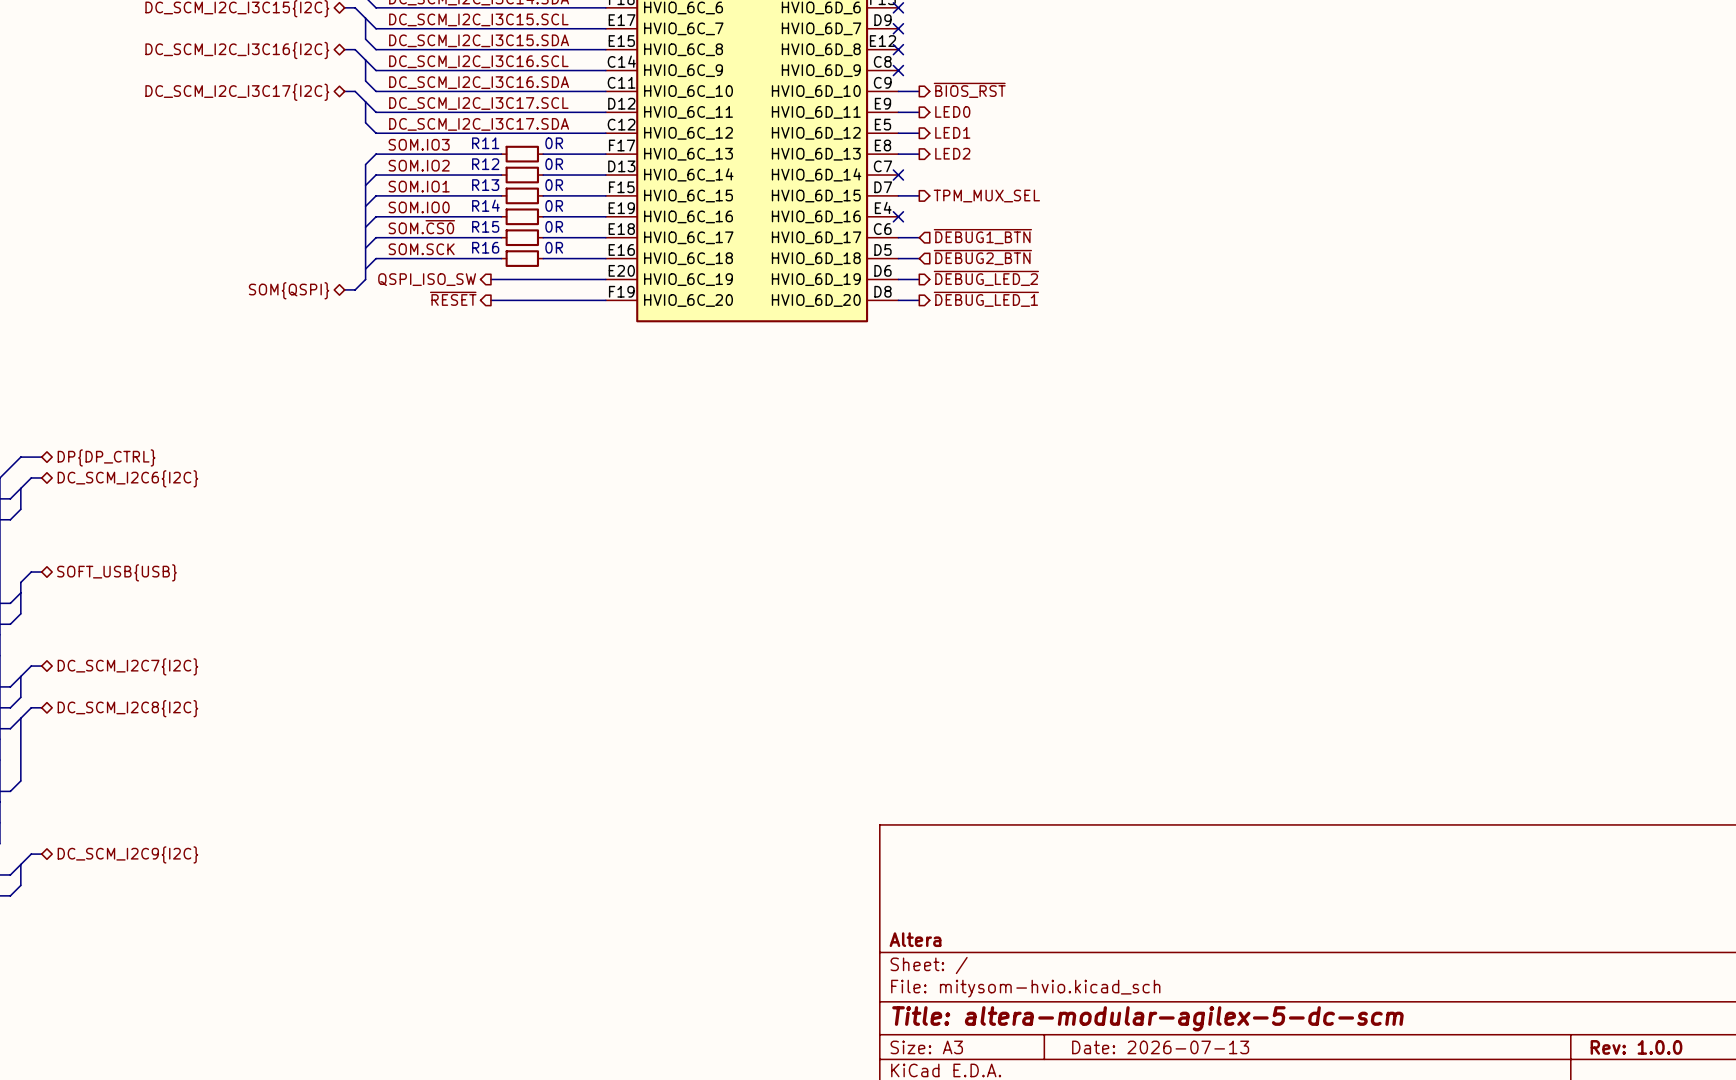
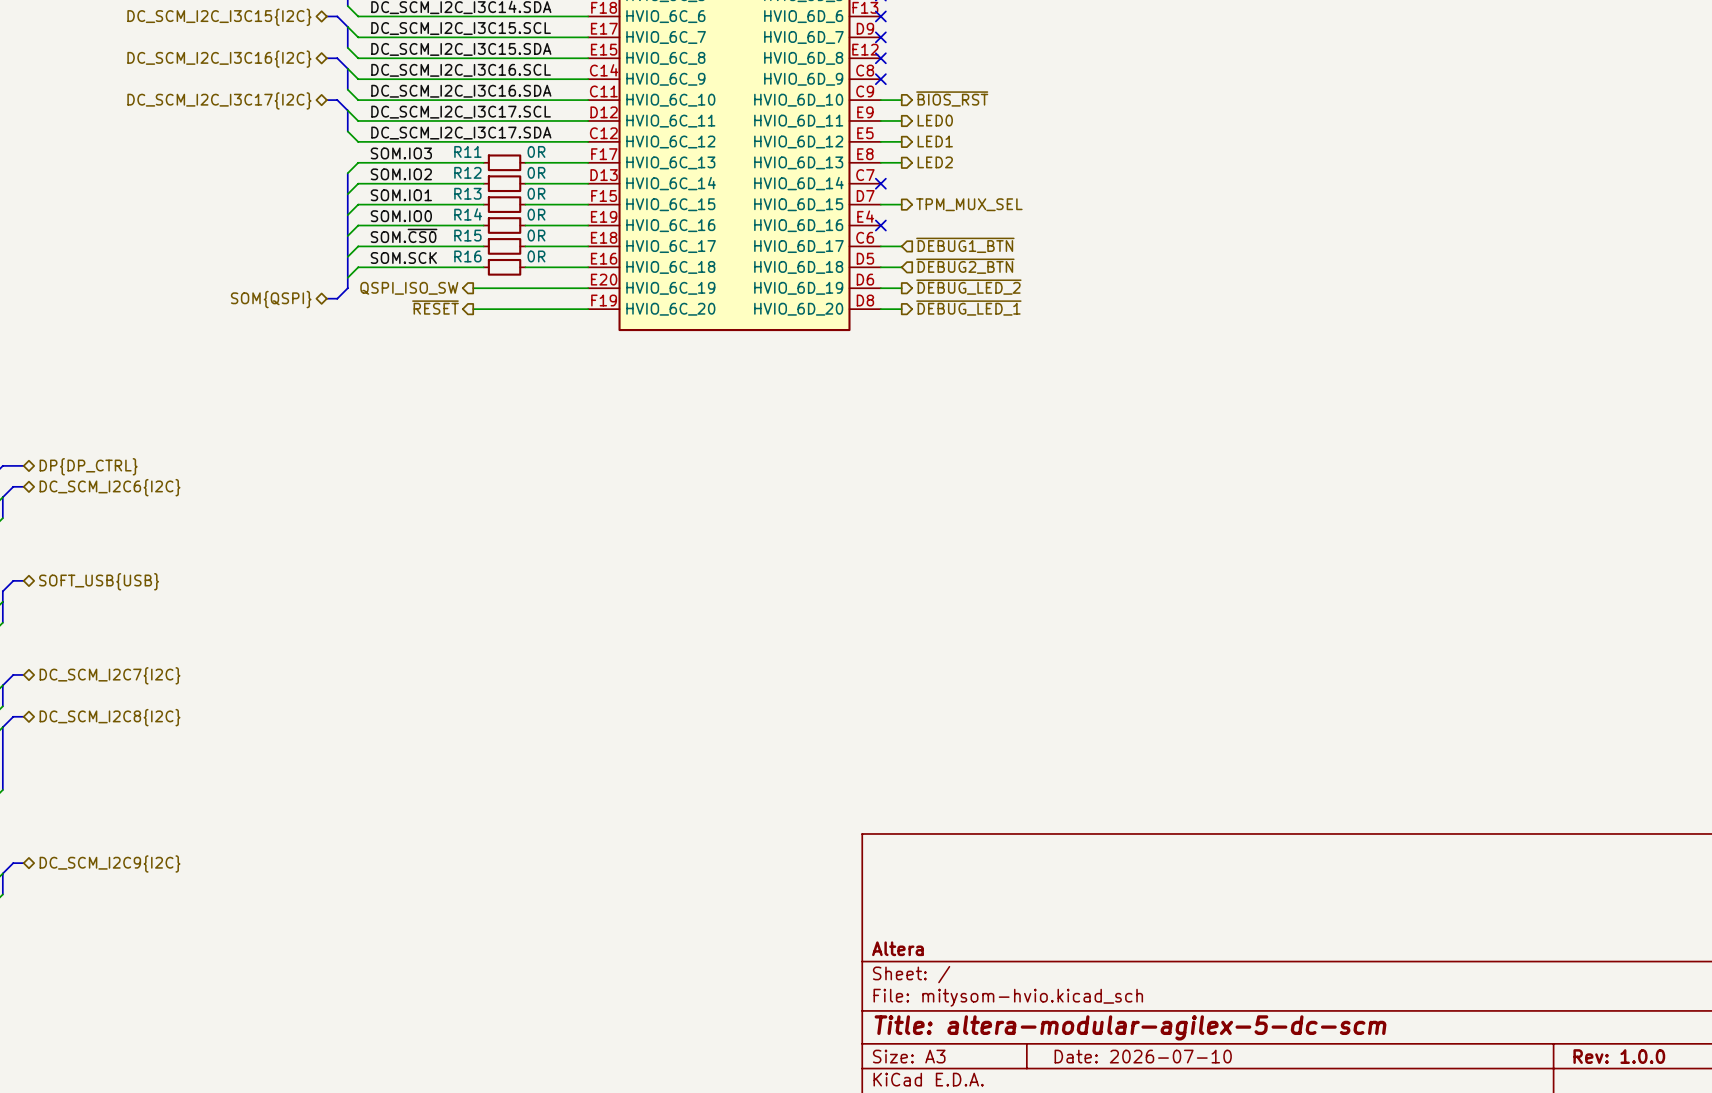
title block: Date: 2026-07-13 (1160, 1047) -> Date: 2026-07-10 (1143, 1056)

